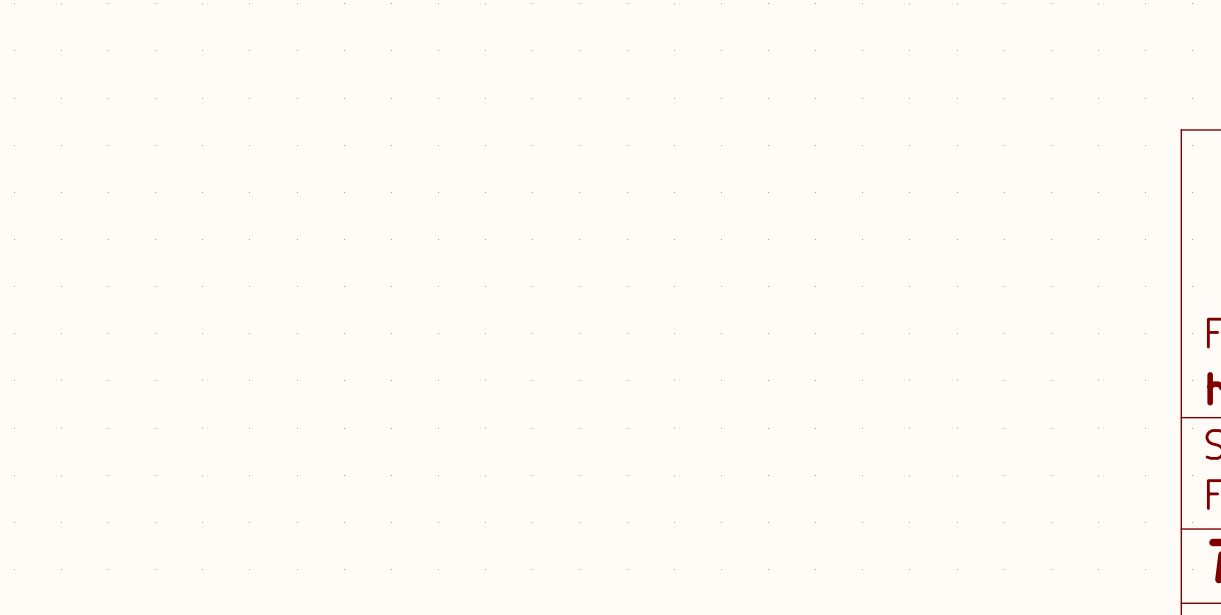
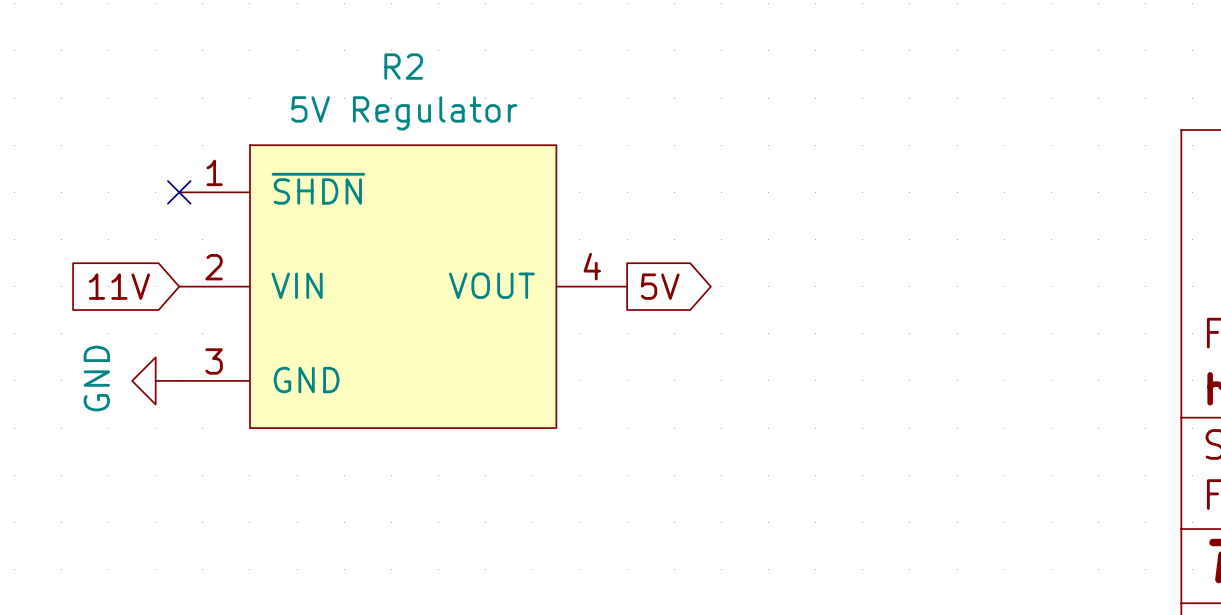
no-connect mark: none -> (179, 192)
global label: none -> 11V (119, 286)
R2: none -> 5V Regulator (403, 286)
global label: none -> 5V (660, 286)
power symbol: none -> GND (155, 380)

